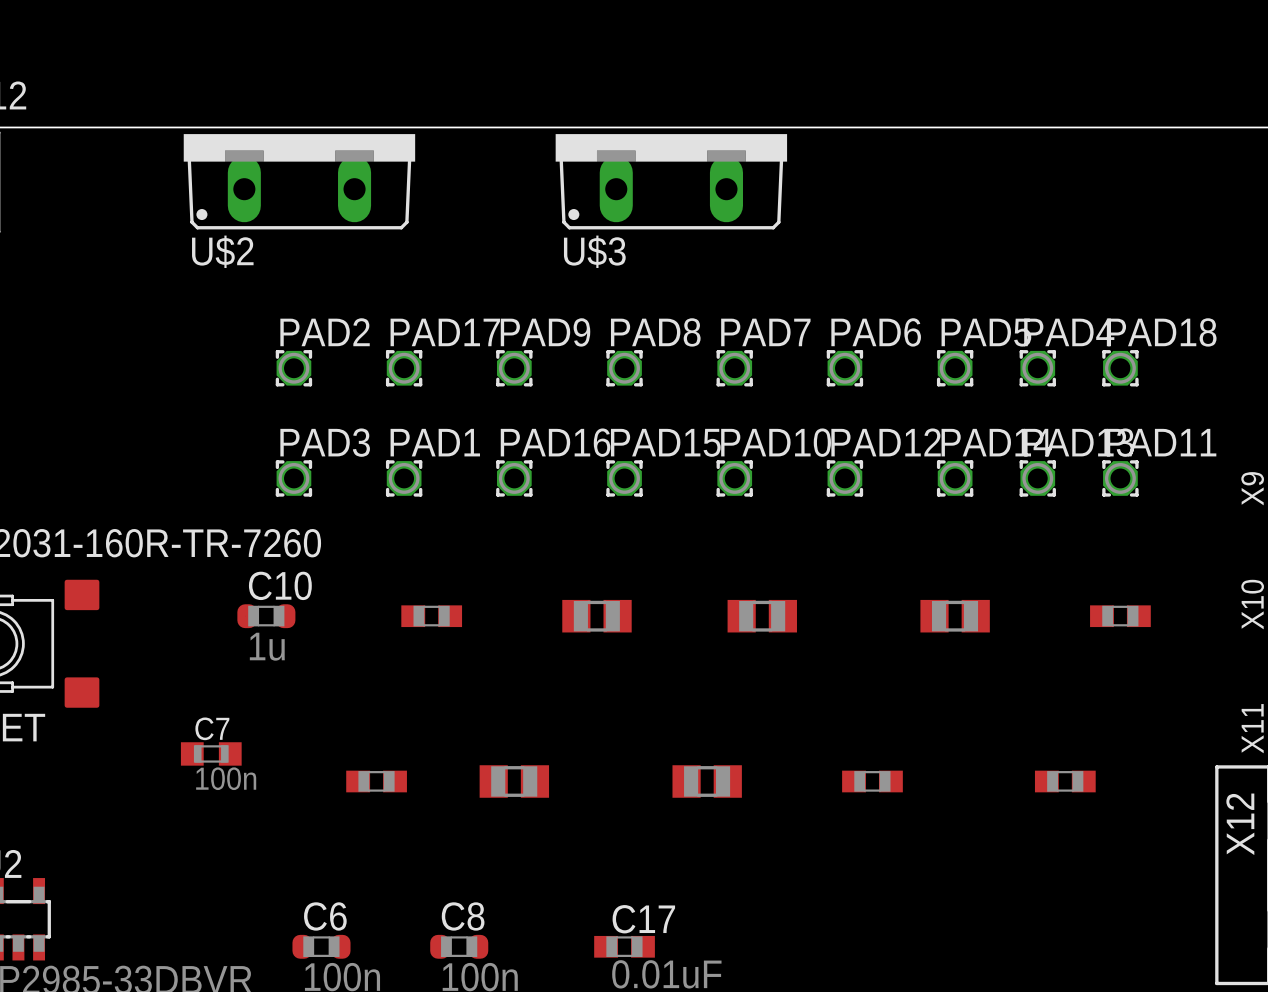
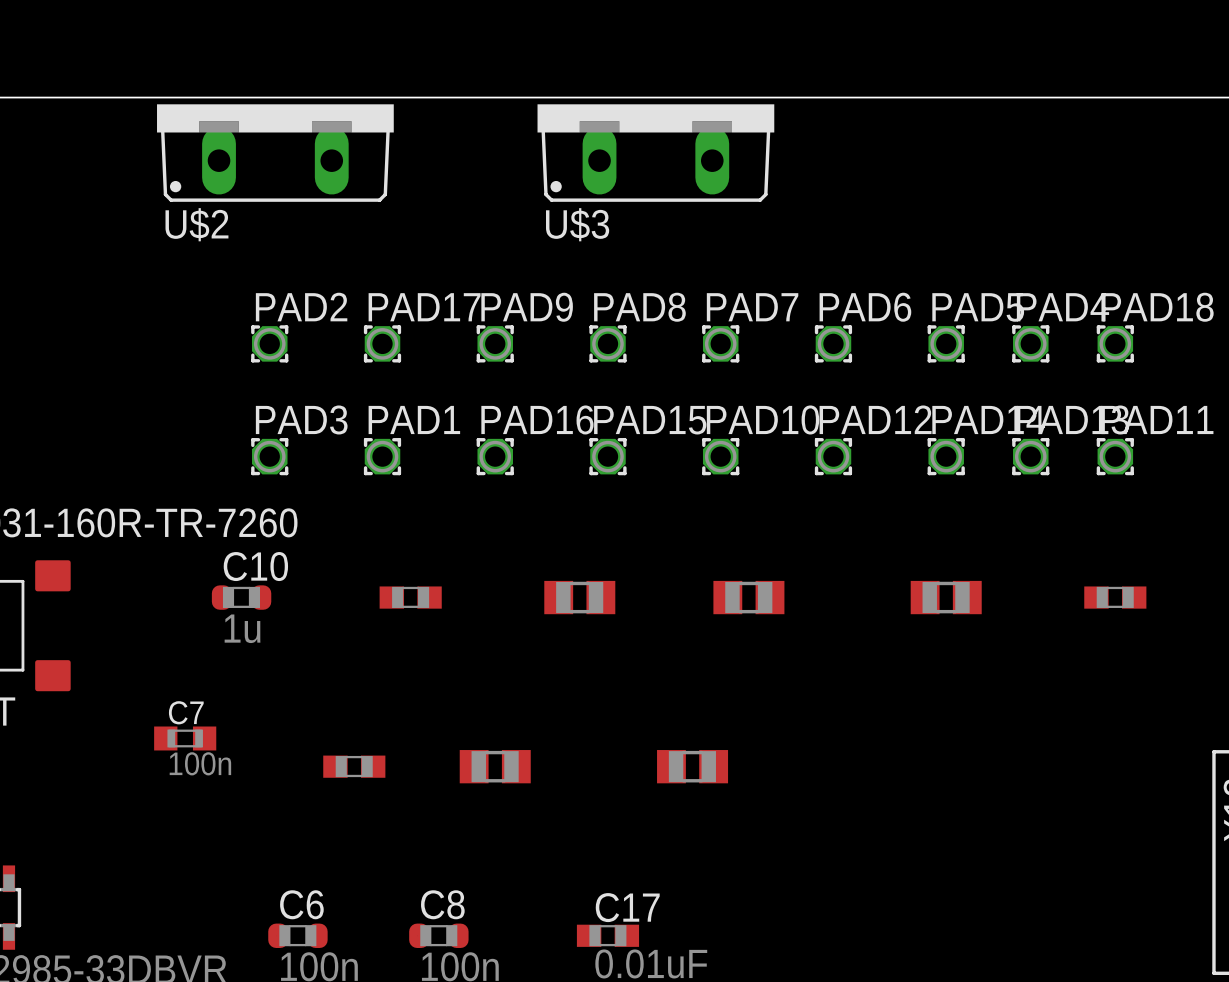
part: (872, 781) -> none
part: (1065, 781) -> none

